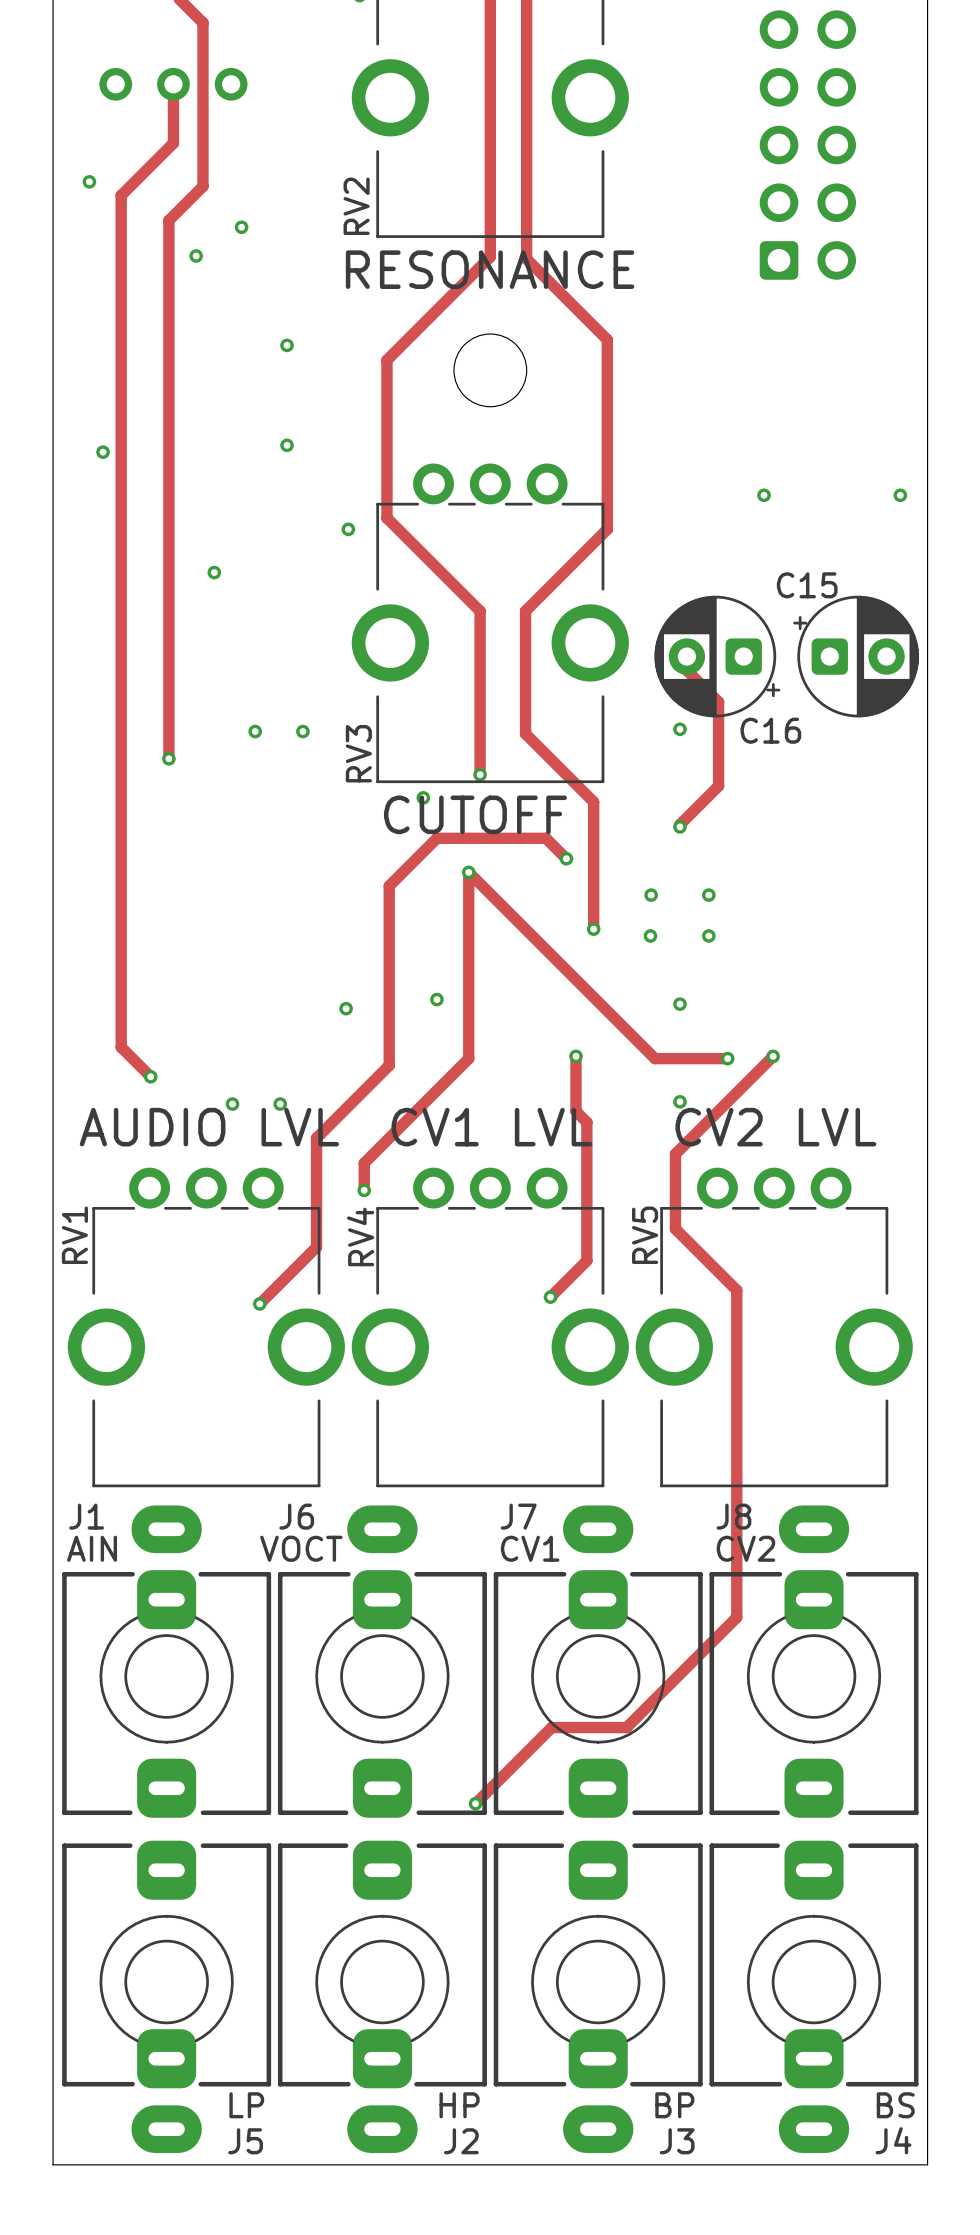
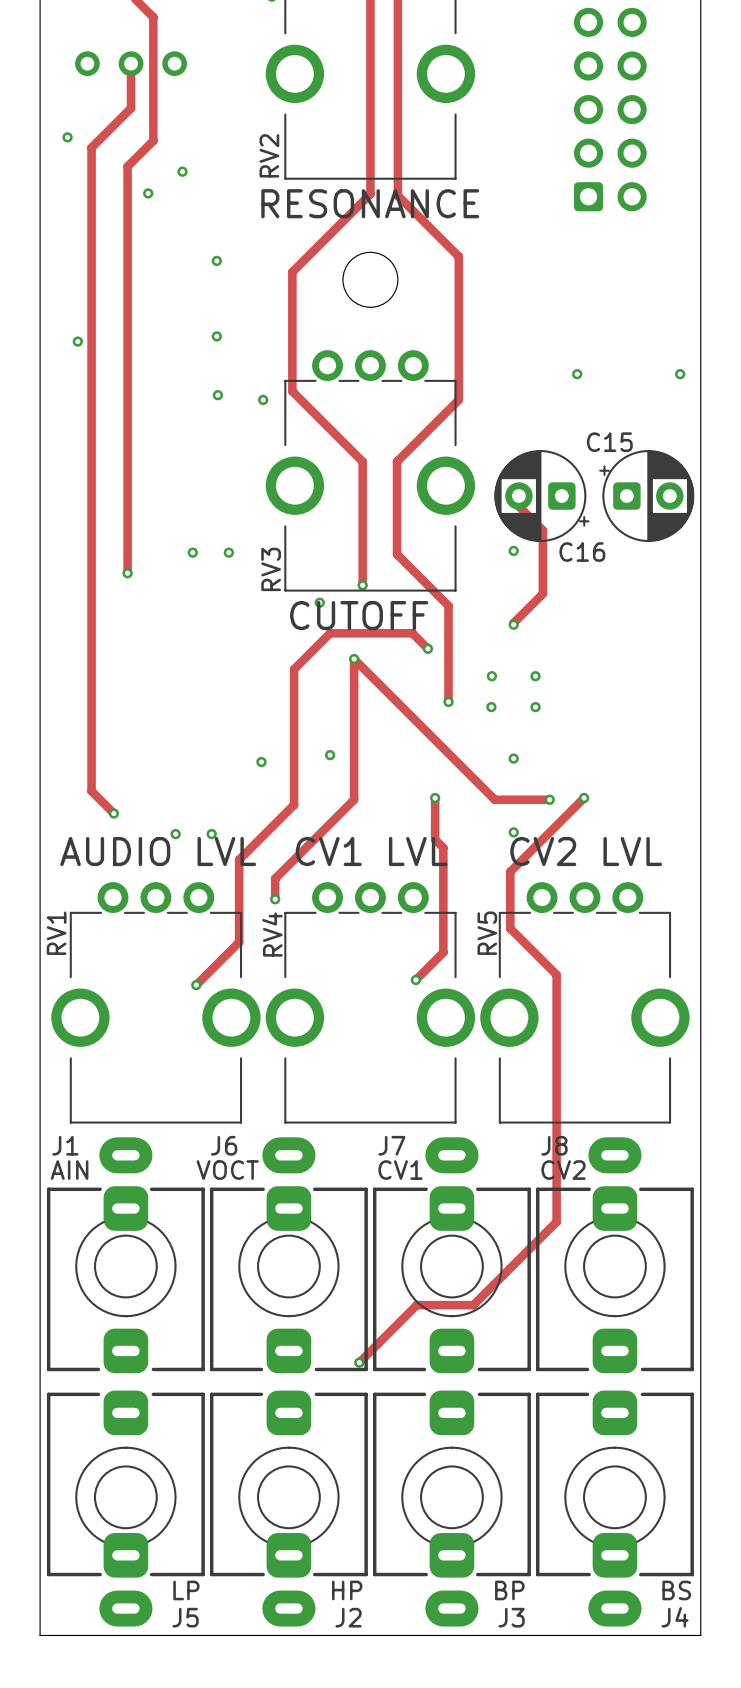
via position: (214, 572) -> (217, 395)

